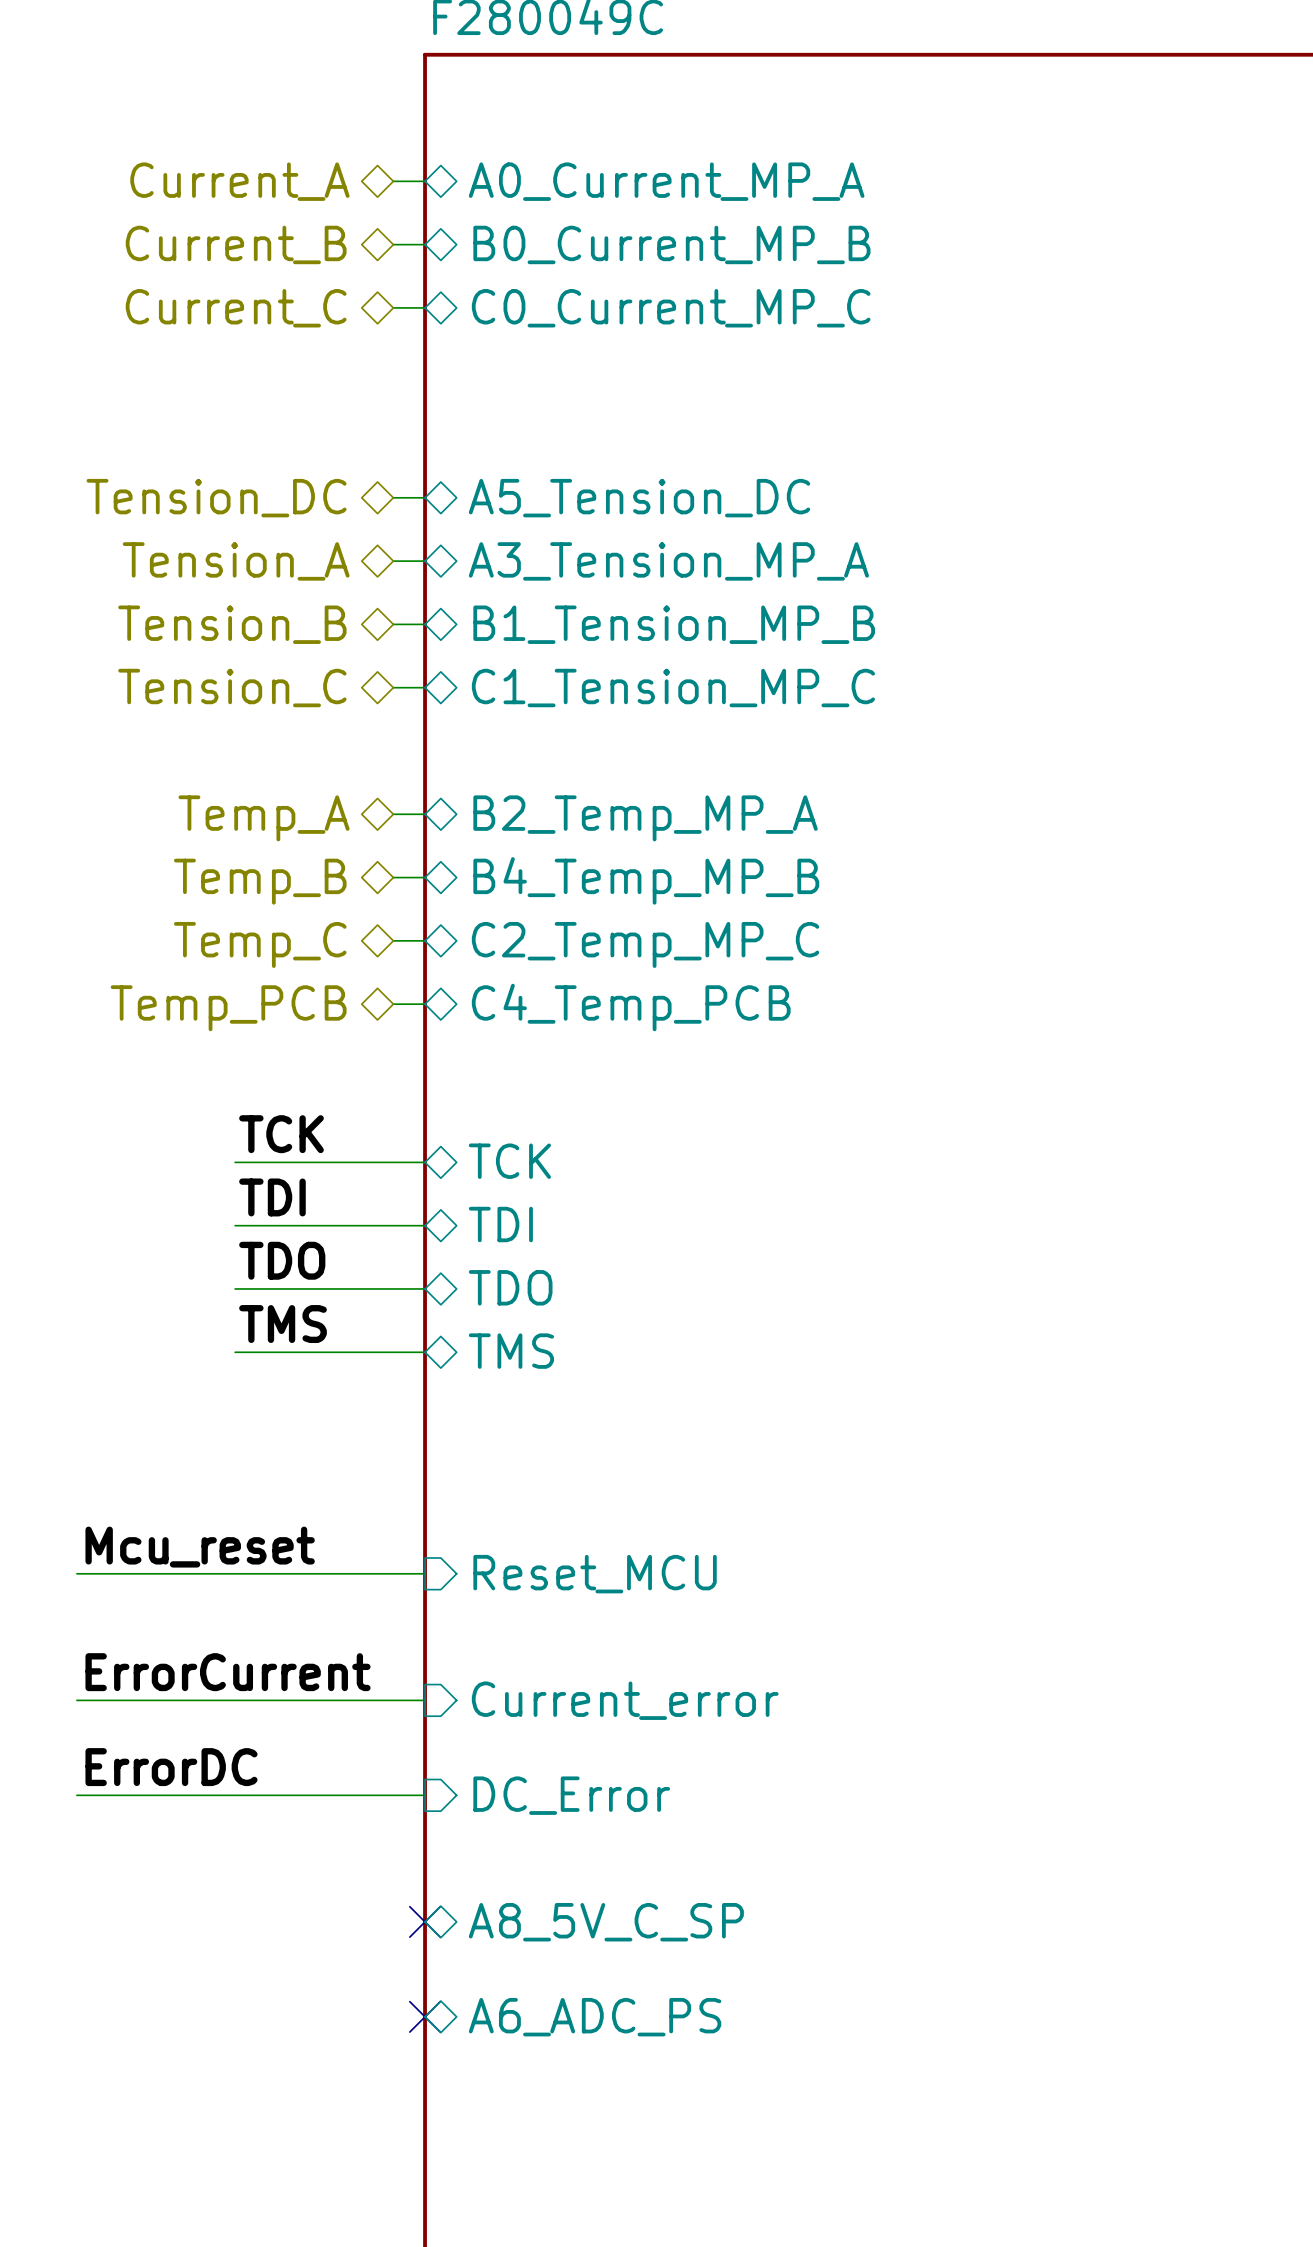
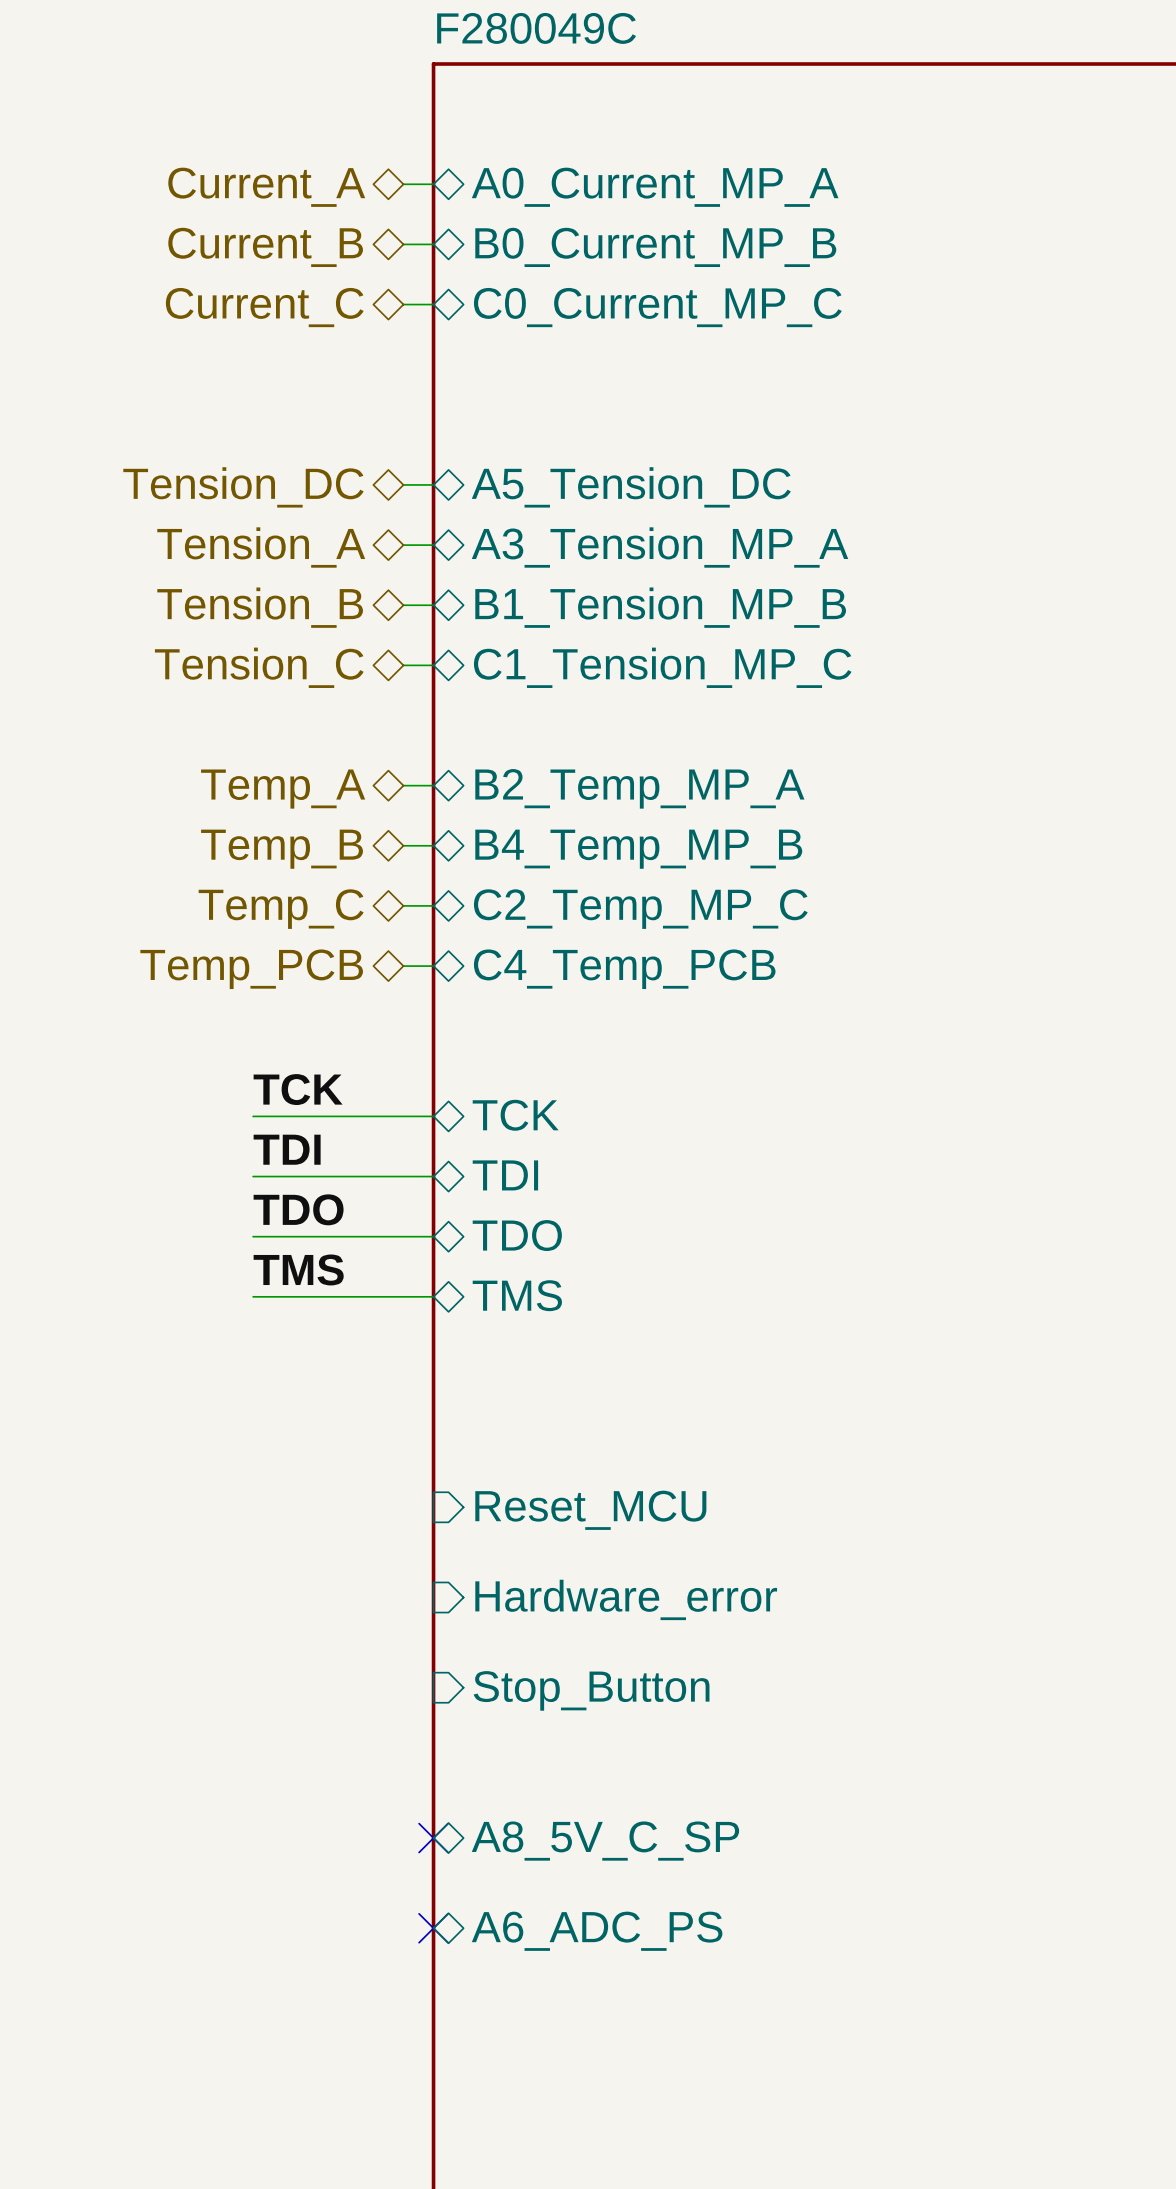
label: Mcu_reset (200, 1547) -> none
wire: (76, 1573) (425, 1573) -> none
label: ErrorCurrent (228, 1672) -> none
wire: (76, 1700) (425, 1700) -> none
sheet pin: Current_error (625, 1700) -> Hardware_error (626, 1599)
label: ErrorDC (171, 1767) -> none
sheet pin: none -> Stop_Button (591, 1690)
wire: (76, 1795) (425, 1795) -> none
sheet pin: DC_Error (571, 1795) -> none

